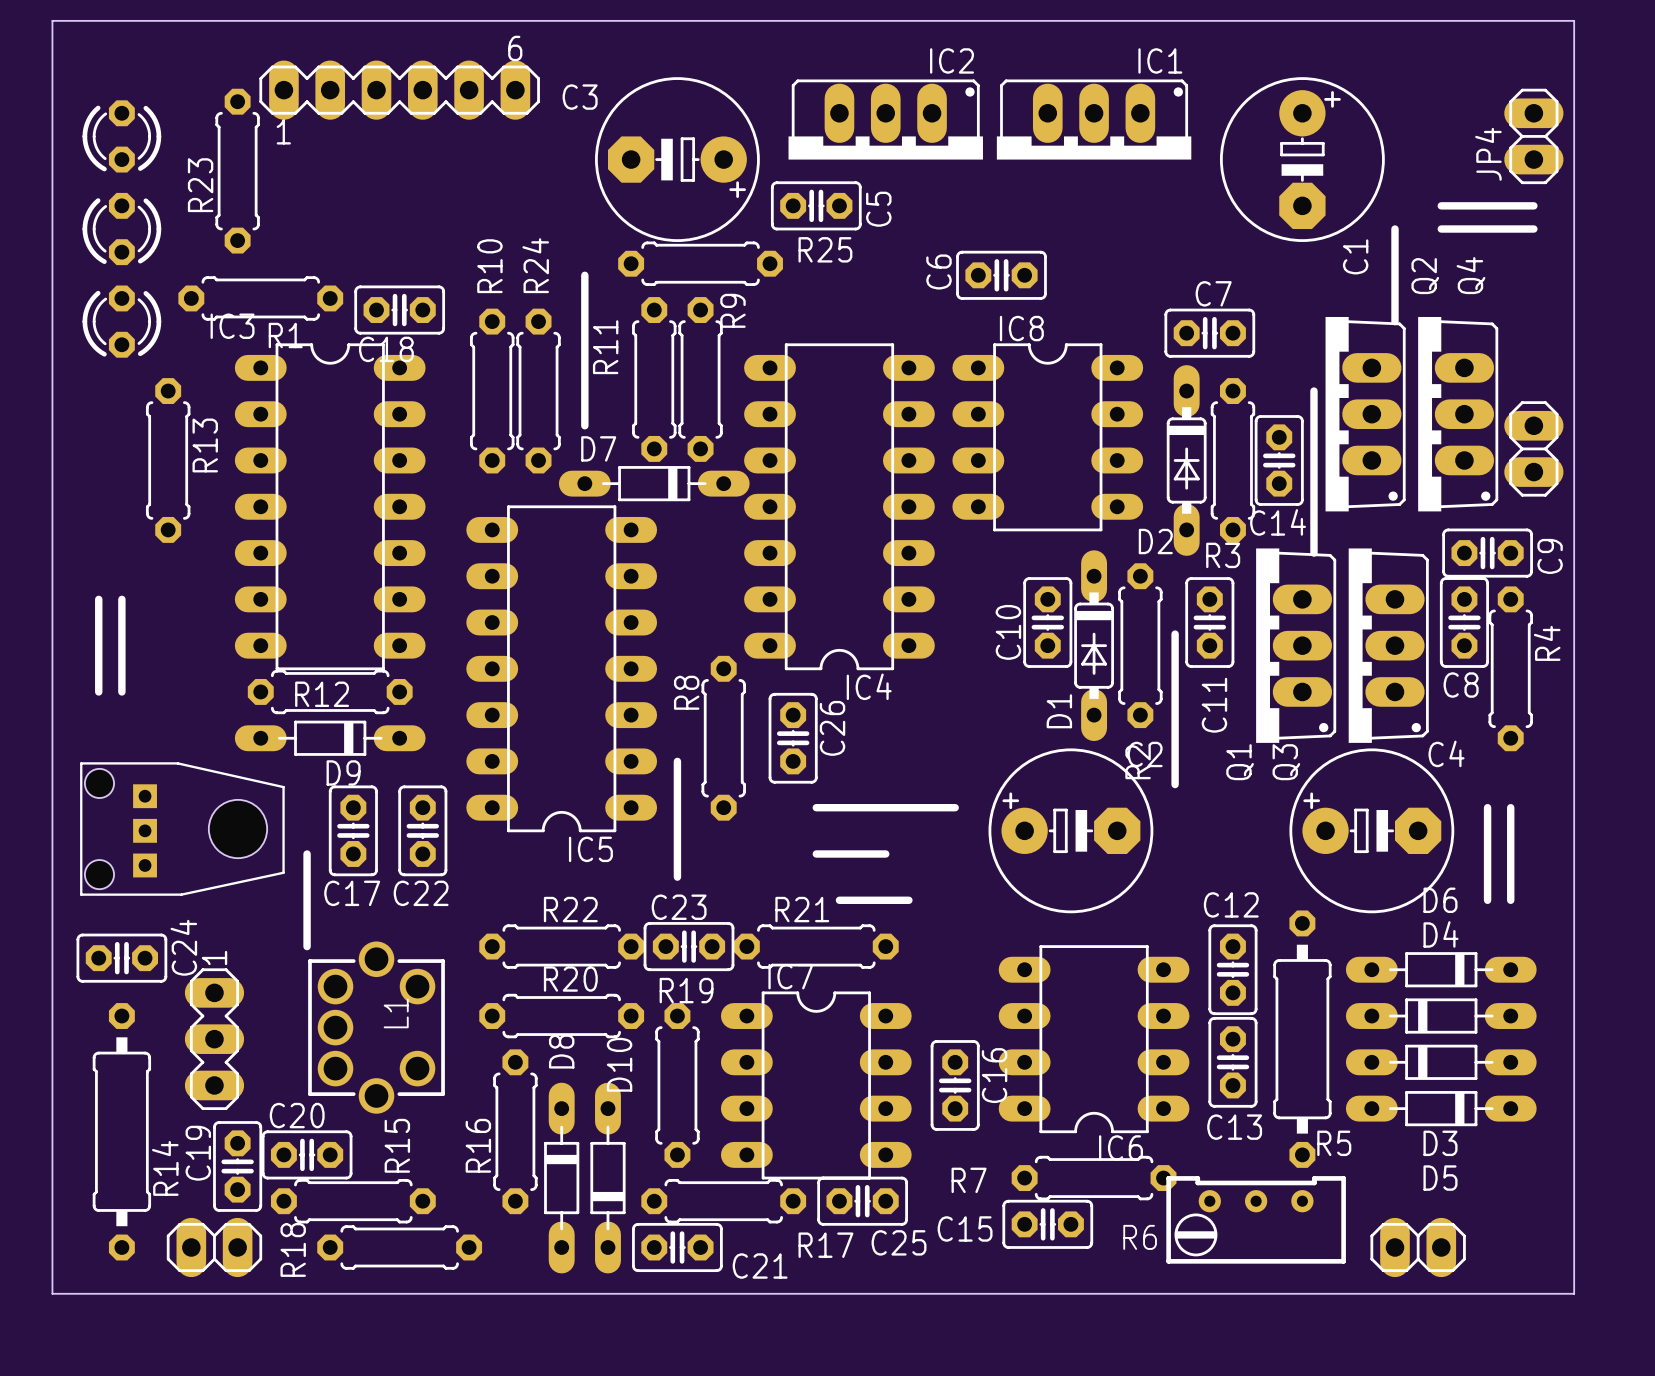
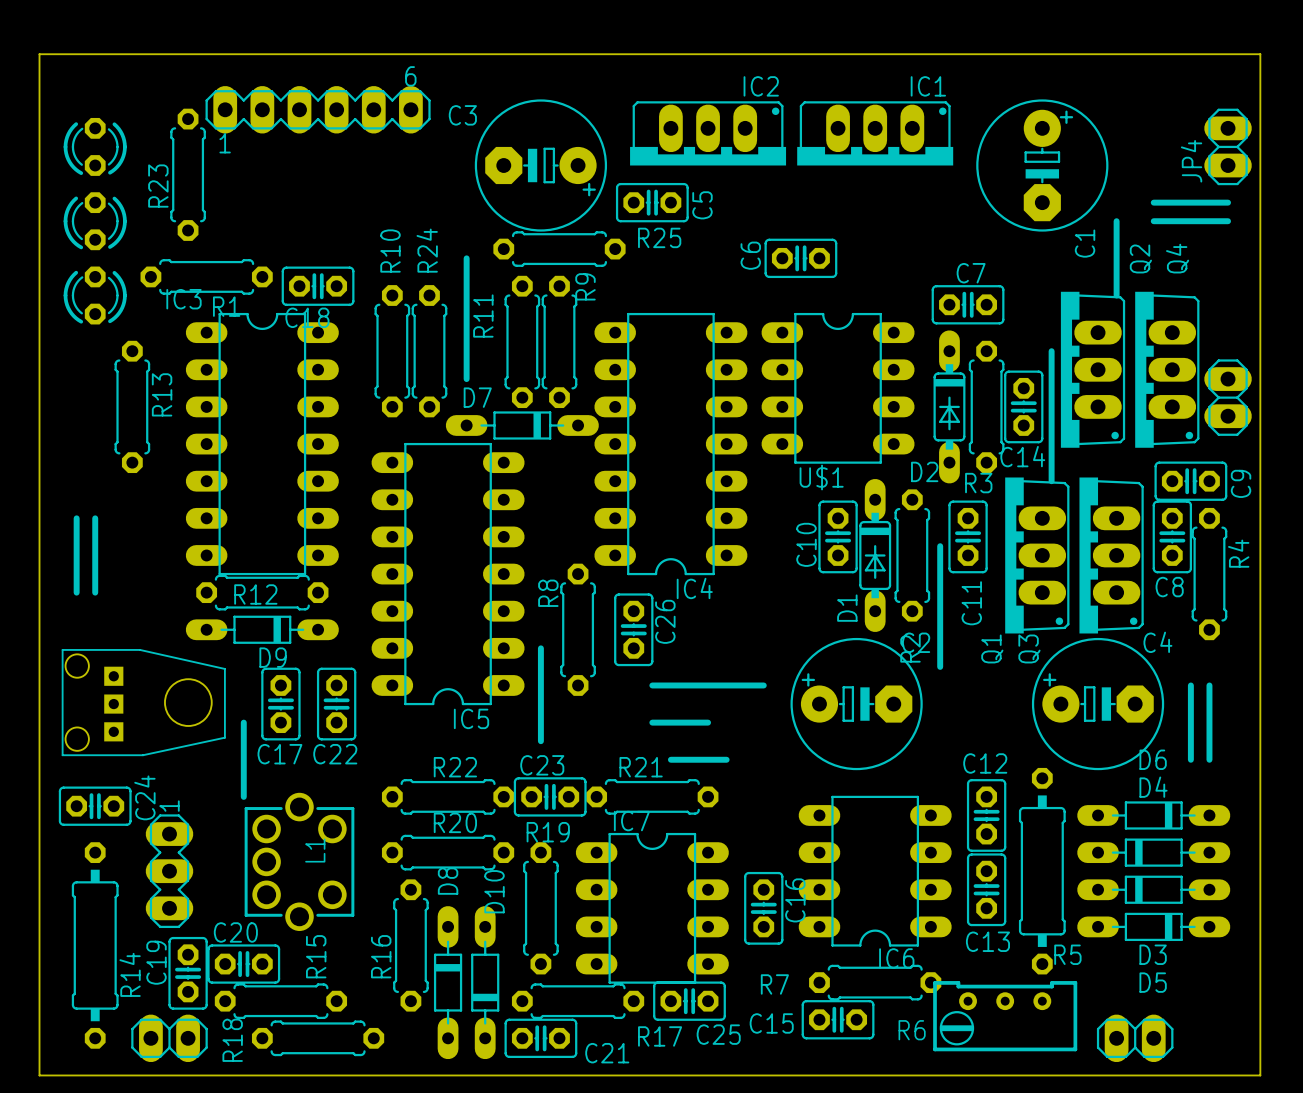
IC8 name: IC8 (1021, 328) -> U$1 (821, 477)

